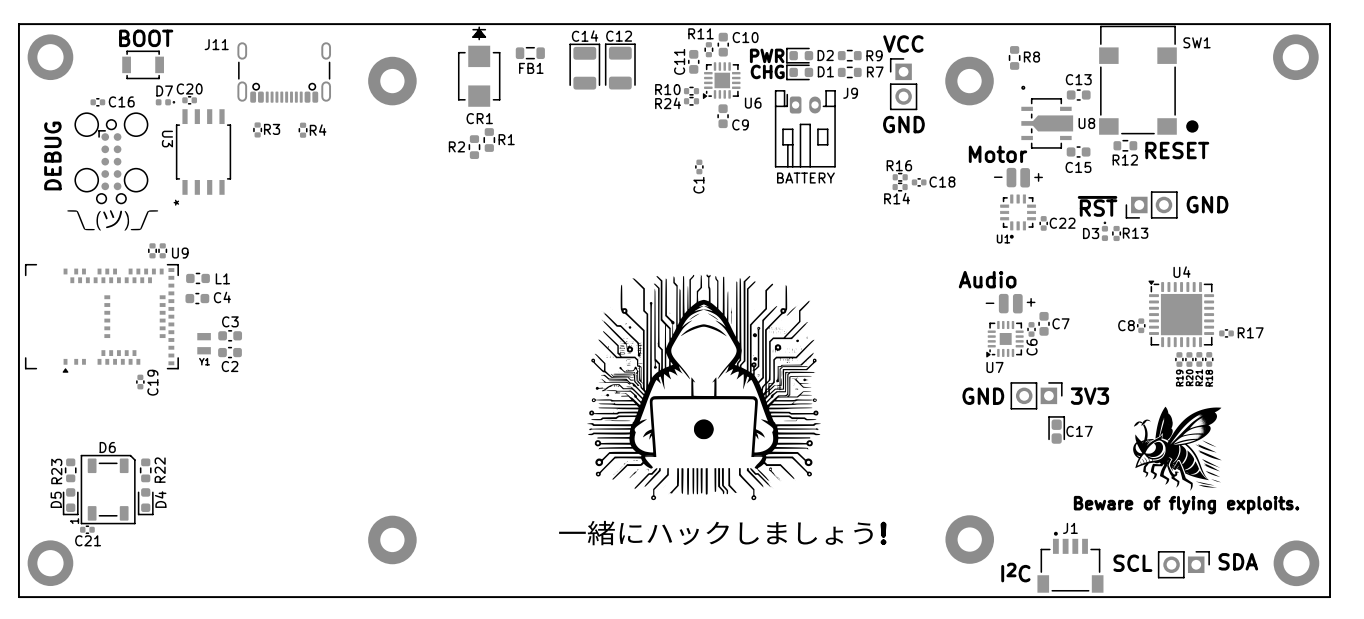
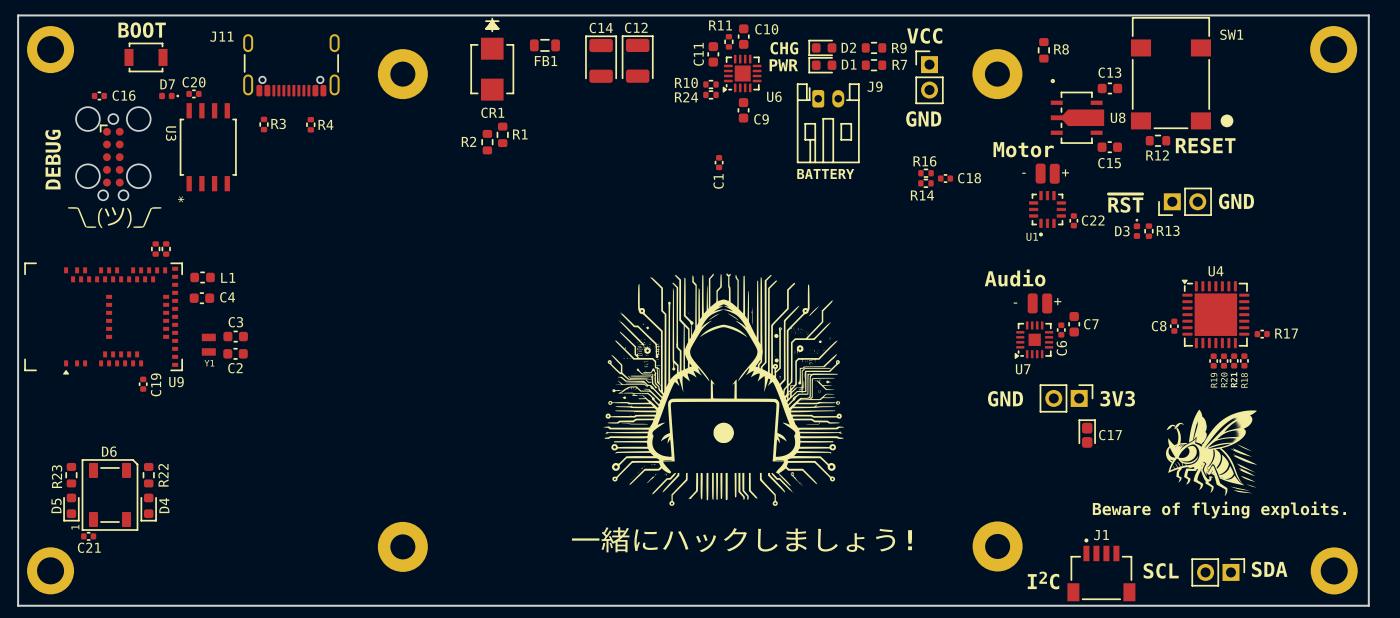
text: PWR (767, 55) -> CHG (784, 48)
text: CHG (767, 71) -> PWR (783, 65)
U9 name position: U9 (180, 253) -> U9 (176, 382)

